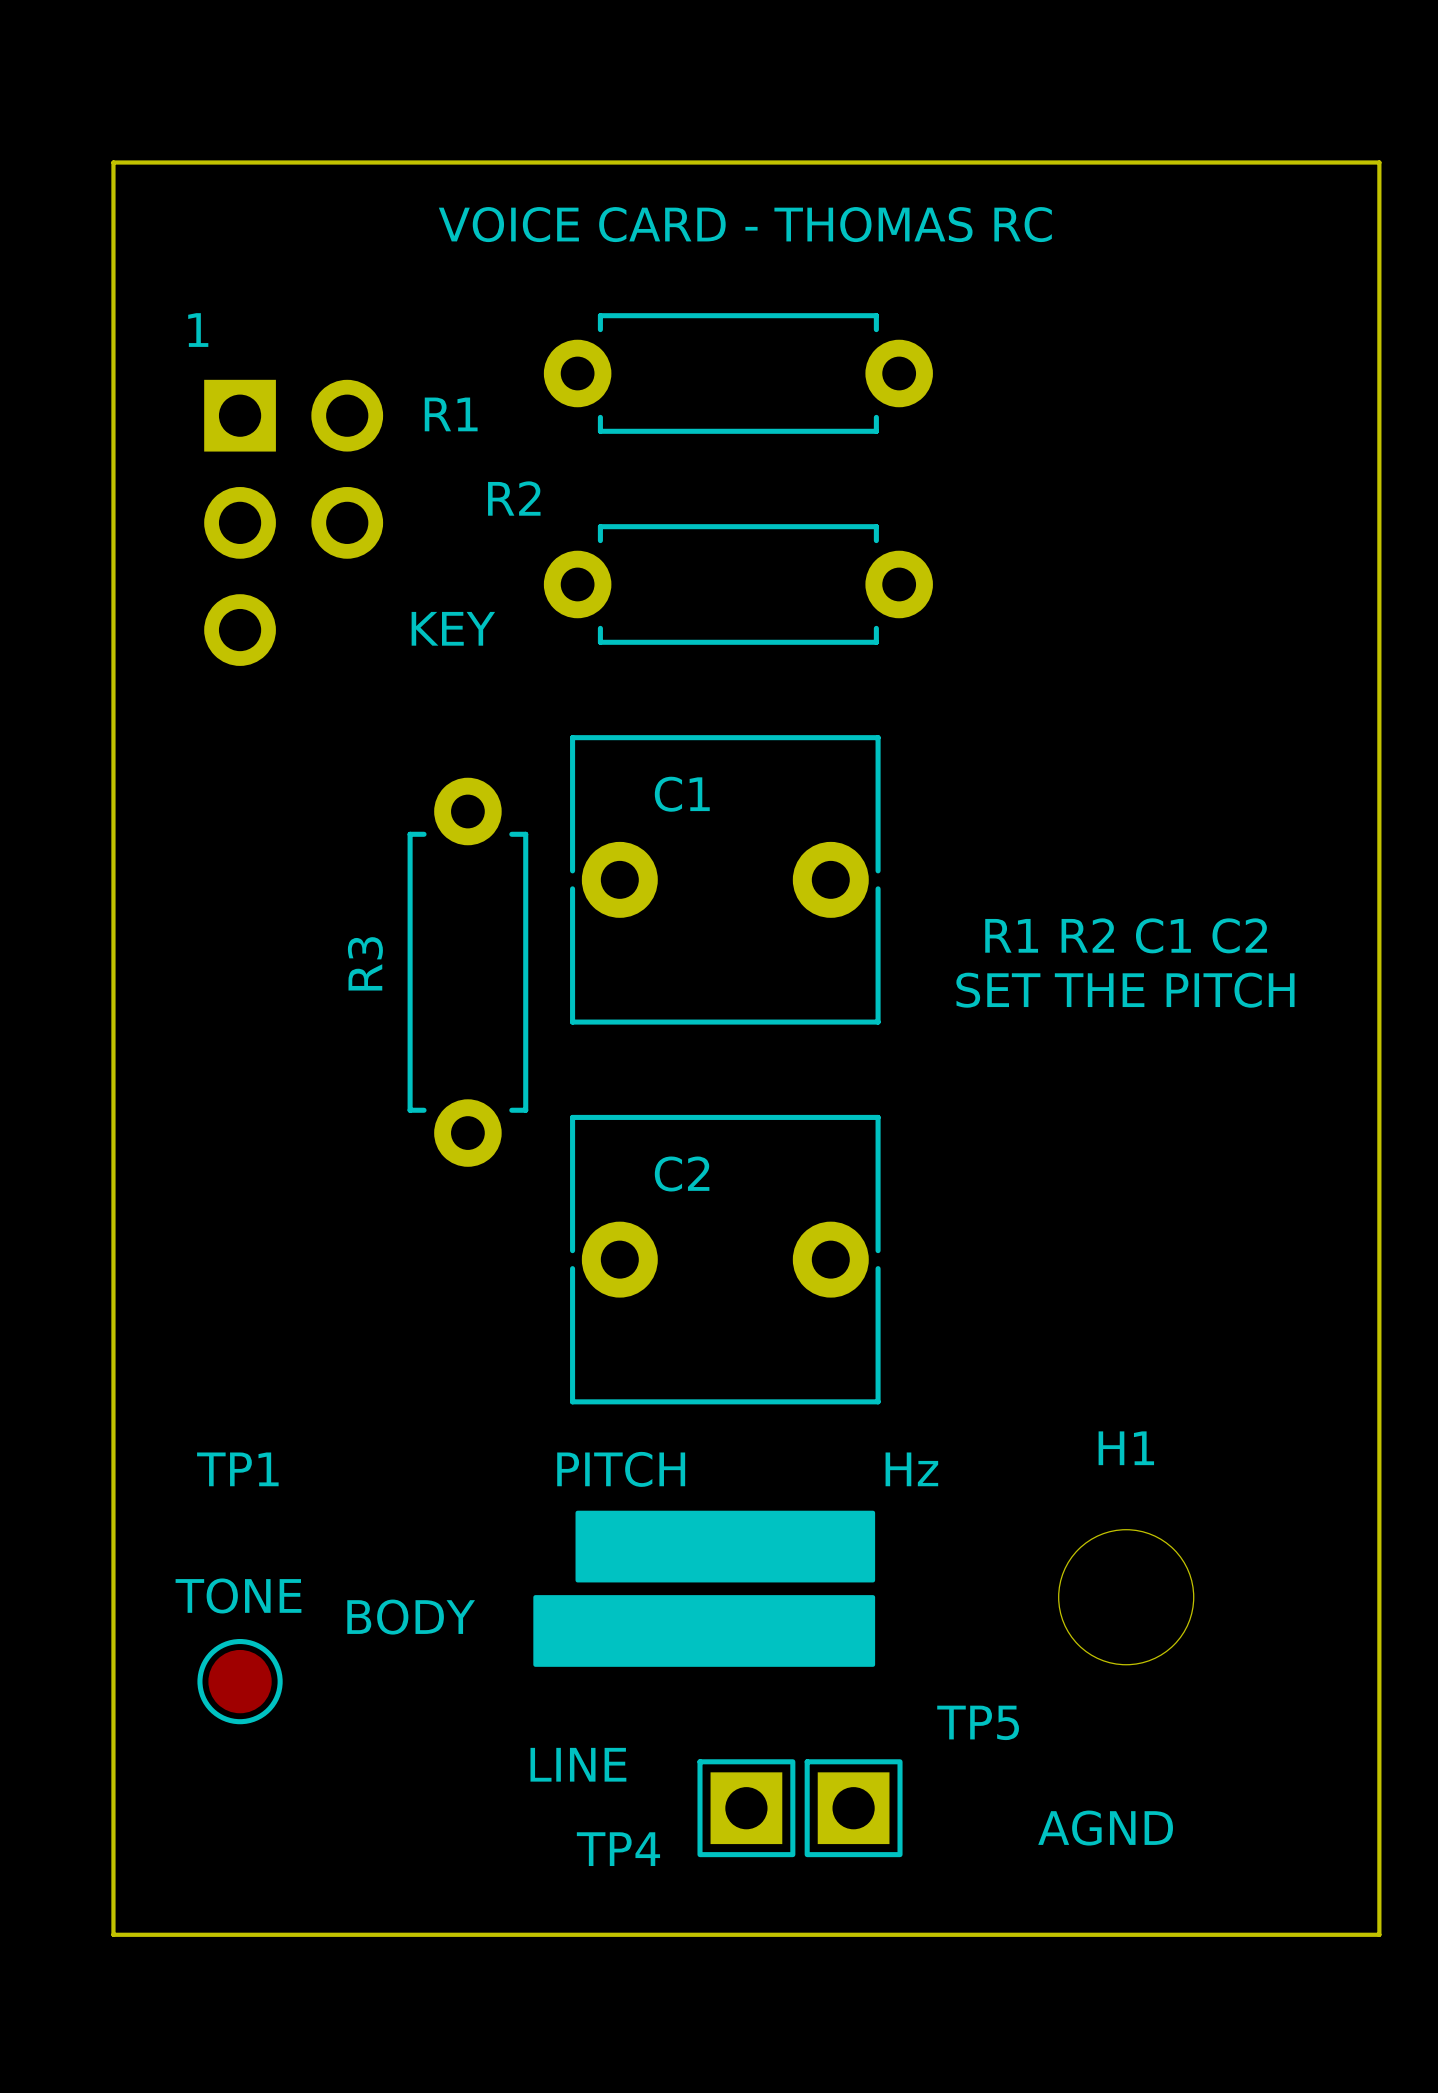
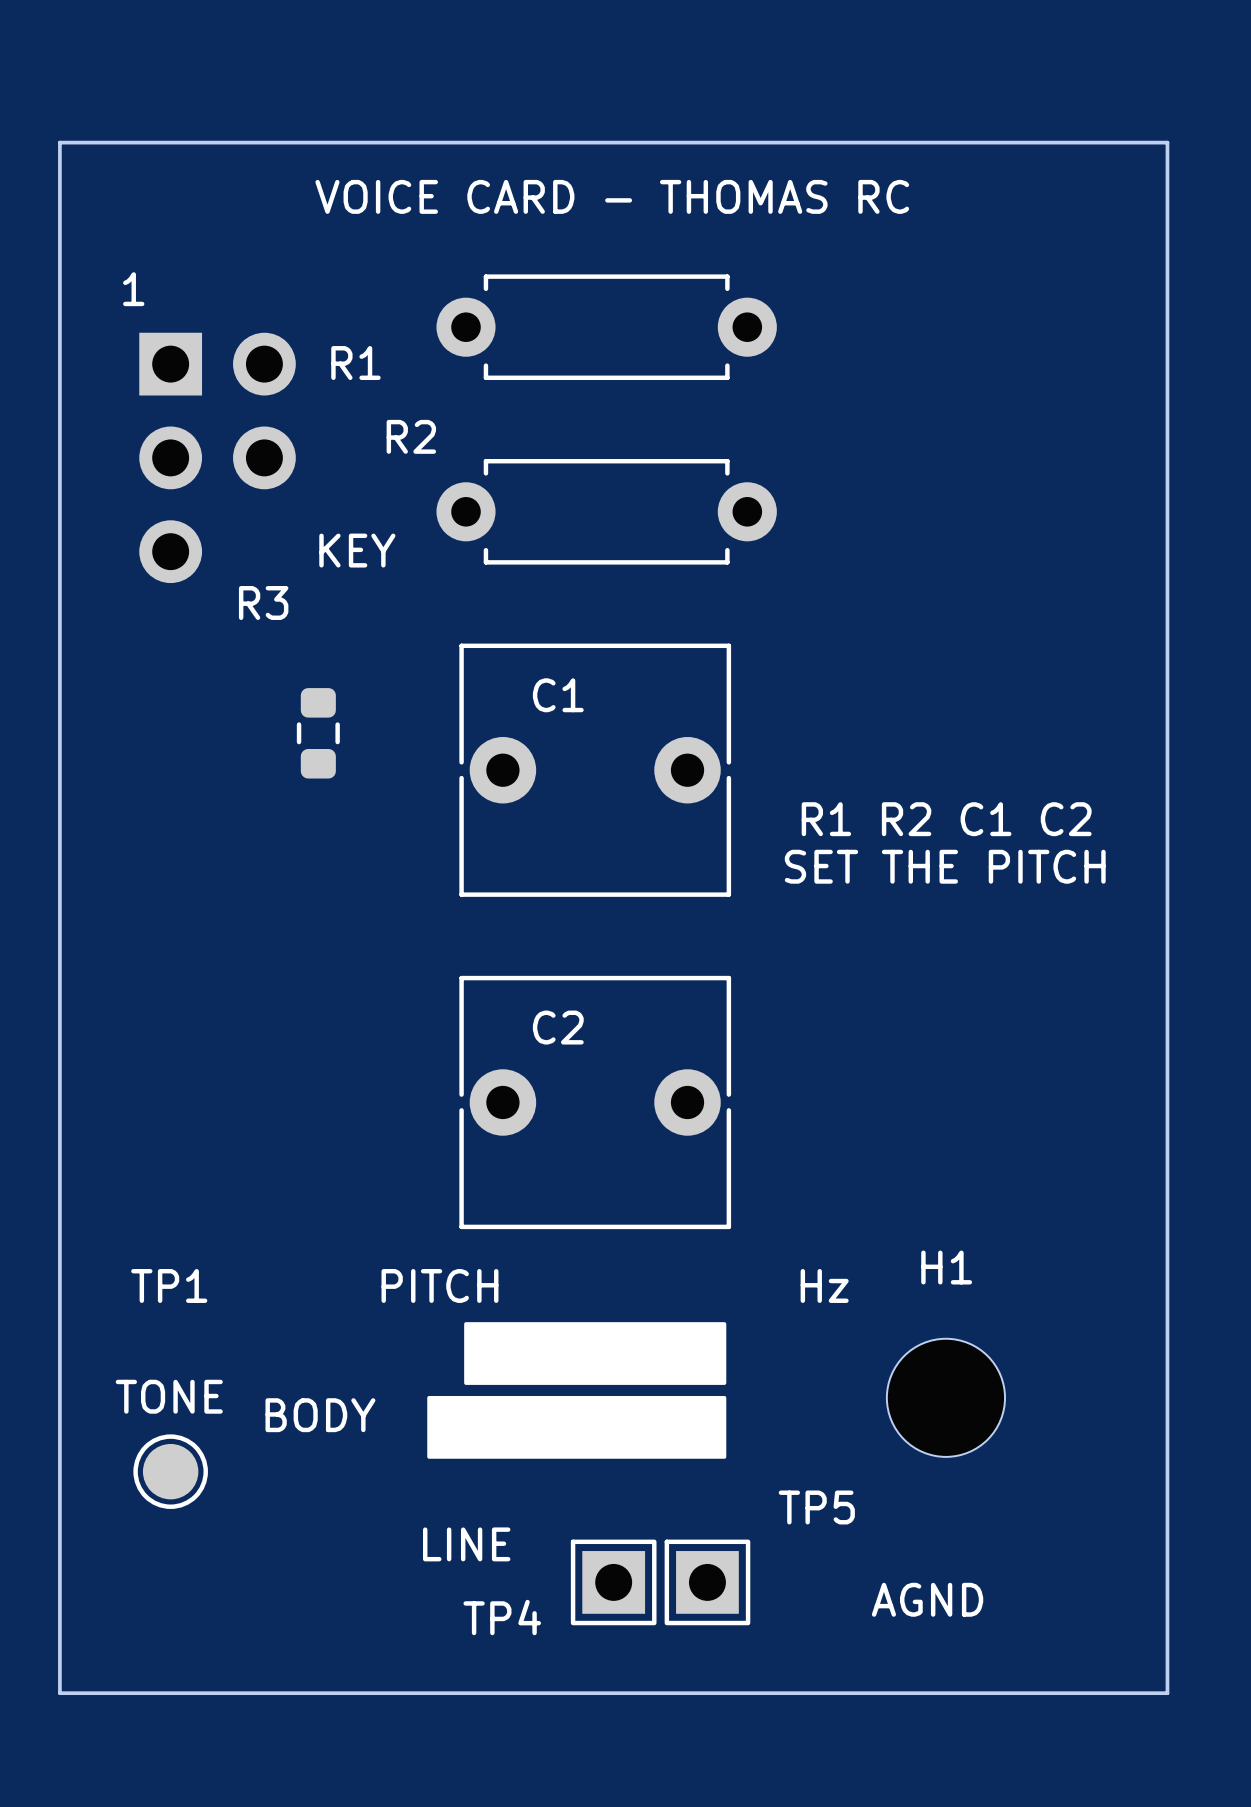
R3 footprint: [407, 777, 529, 1167] -> [296, 688, 340, 779]
R3 name position: R3 (365, 963) -> R3 (263, 602)

